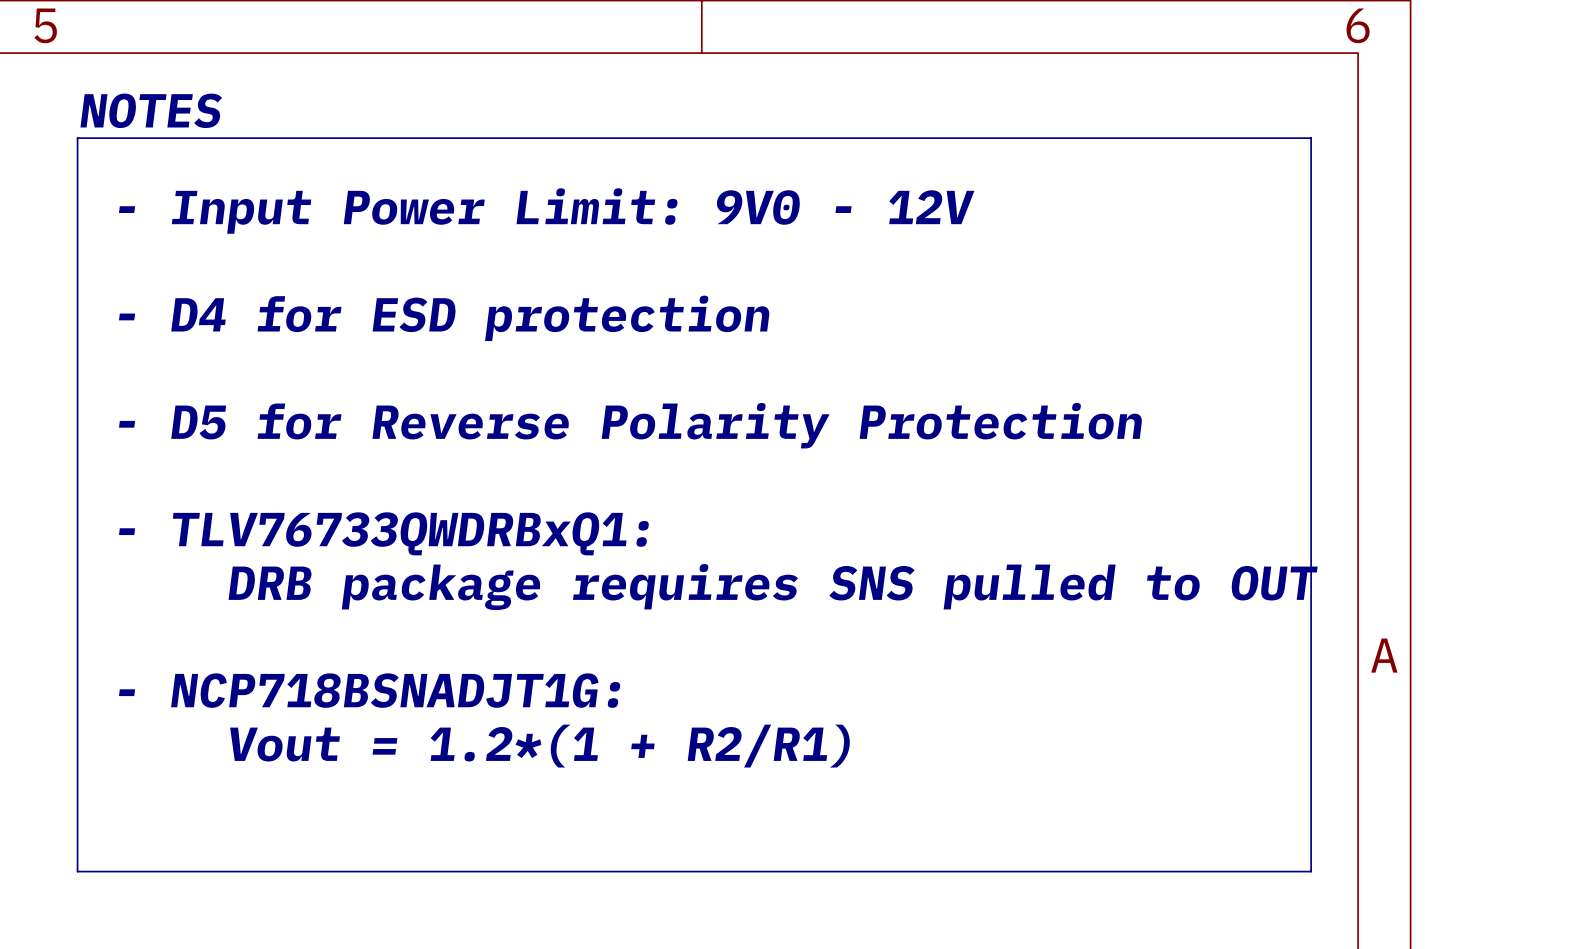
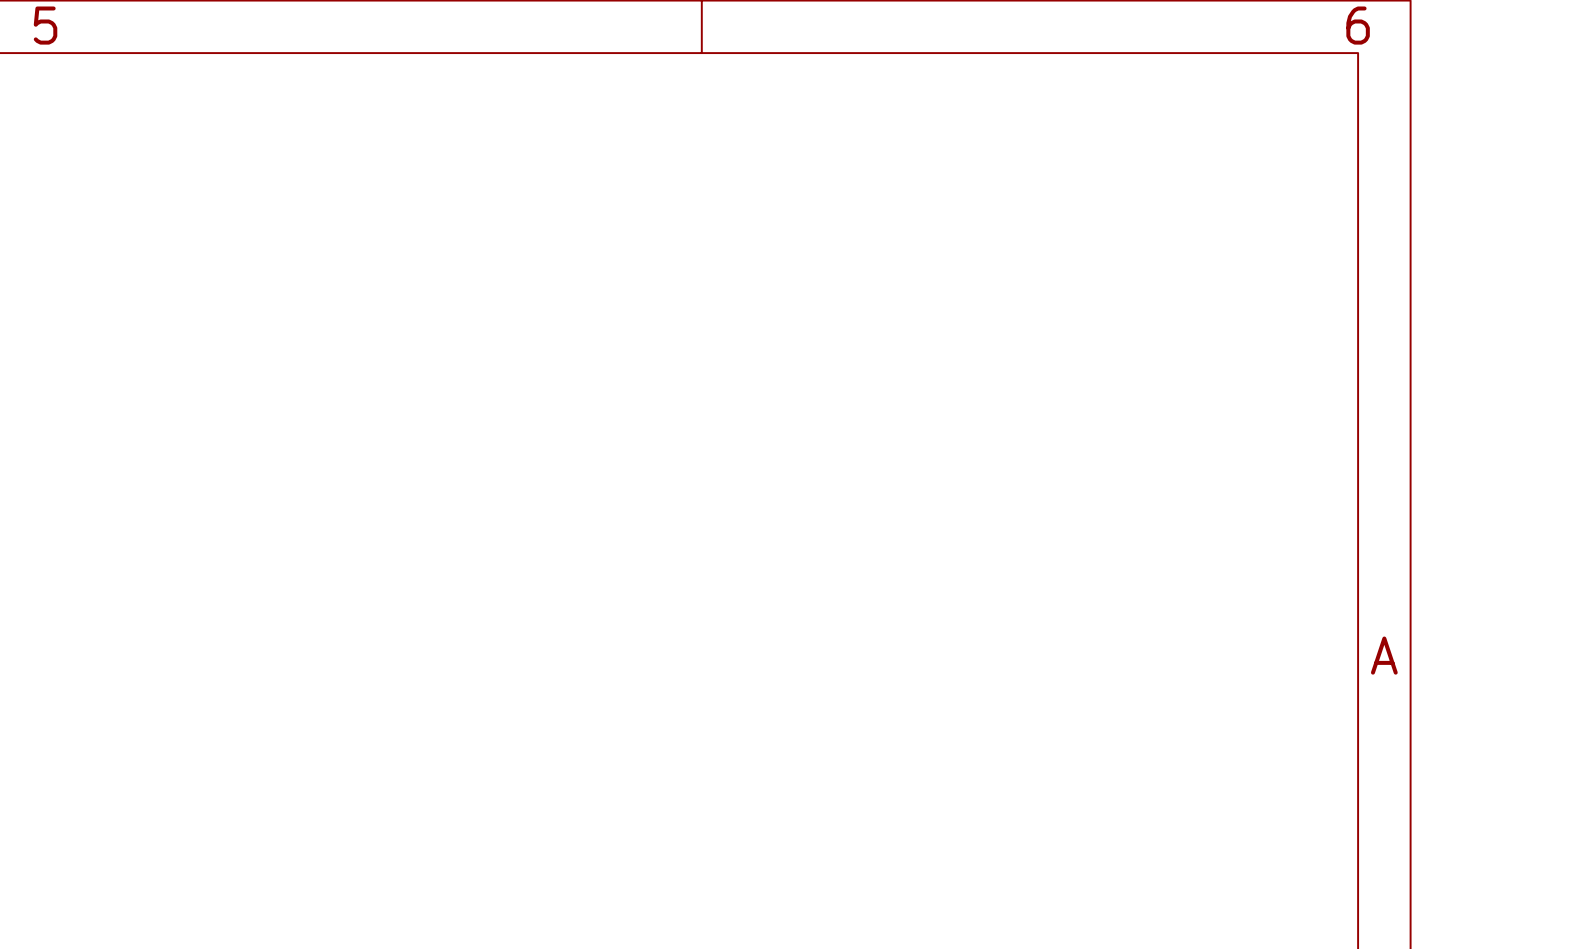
text: NOTES (151, 110) -> none
line: (77, 138) (1311, 138) (1311, 871) (77, 871) (77, 138) -> none
text: - Input Power Limit: 9V0 - 12V (546, 211) -> none
text: - D4 for ESD protection (444, 318) -> none
text: - D5 for Reverse Polarity Protection (630, 425) -> none
text: - TLV76733QWDRBxQ1: (383, 533) -> none
text: DRB package requires SNS pulled to OUT (773, 587) -> none
text: - NCP718BSNADJT1G: (369, 690) -> none
text: Vout = 1.2*(1 + R2/R1) (540, 746) -> none

